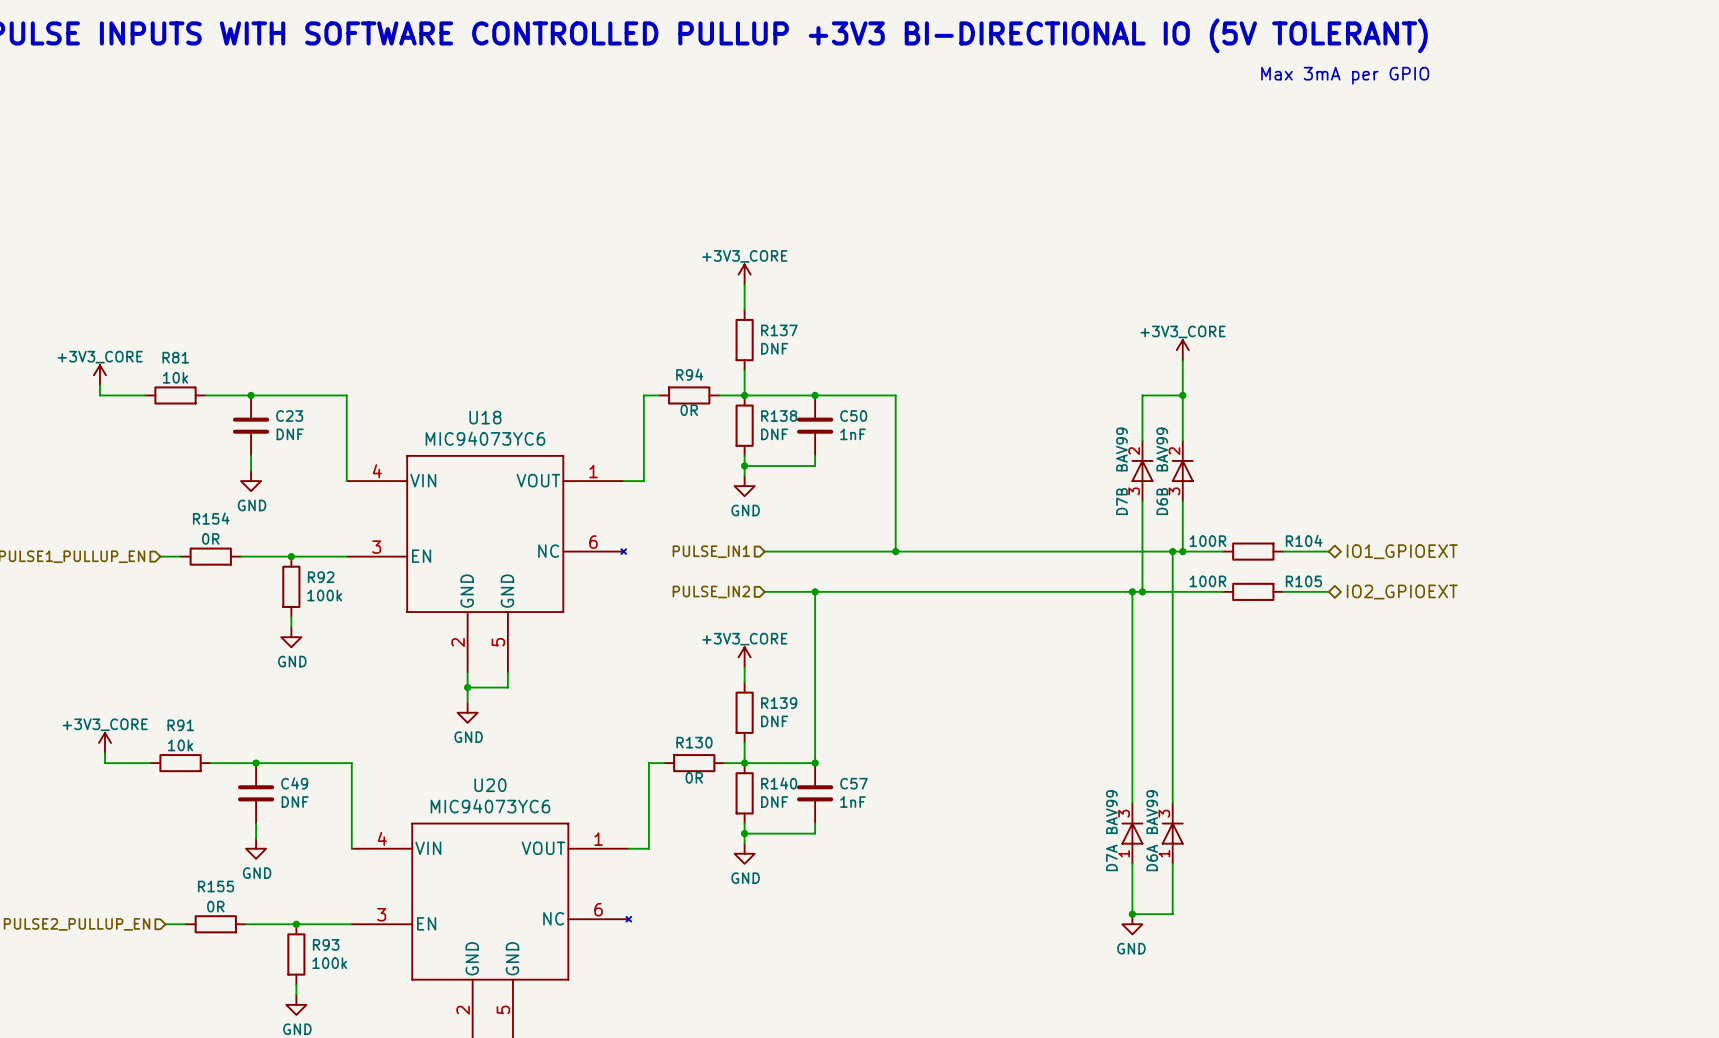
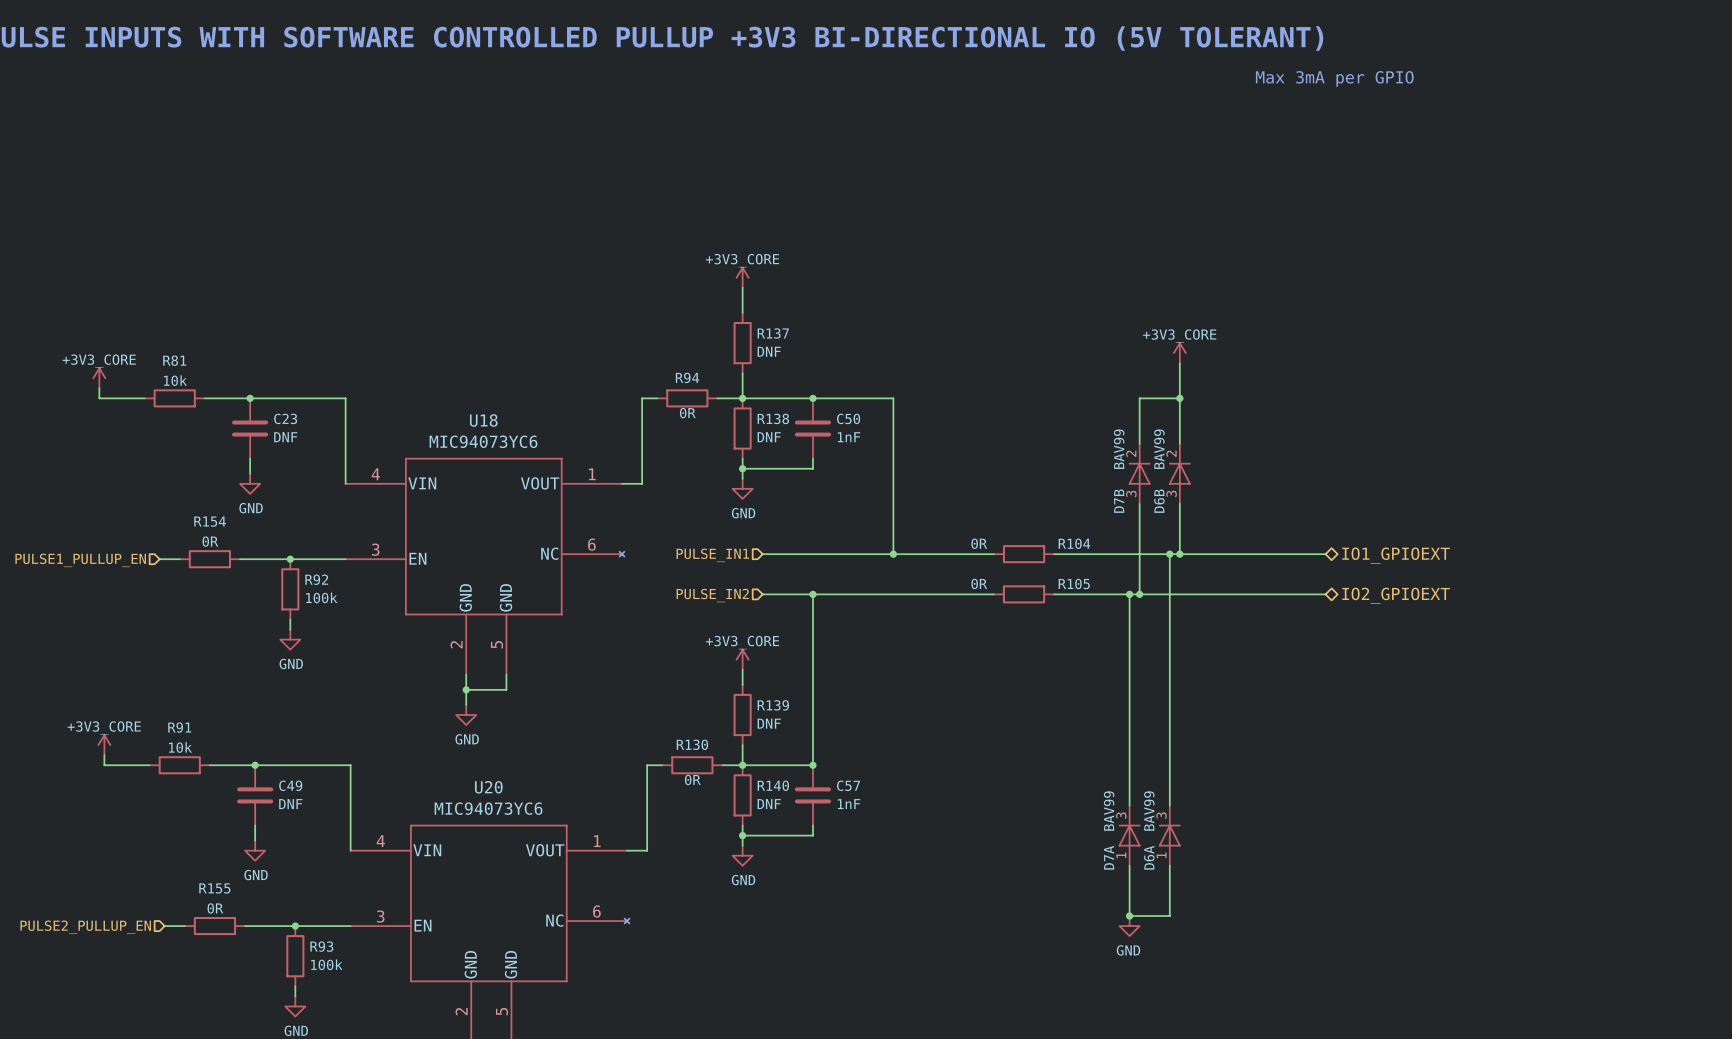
R104 value: 100R (1207, 541) -> 0R (979, 543)
wire: (996, 551) (1056, 551) -> none
wire: none -> (1220, 554) (1280, 554)
R104 position: (1253, 551) -> (1024, 554)
R105 value: 100R (1207, 581) -> 0R (979, 583)
wire: (996, 591) (1056, 591) -> none
wire: none -> (1220, 594) (1280, 594)
R105 position: (1253, 591) -> (1024, 594)

